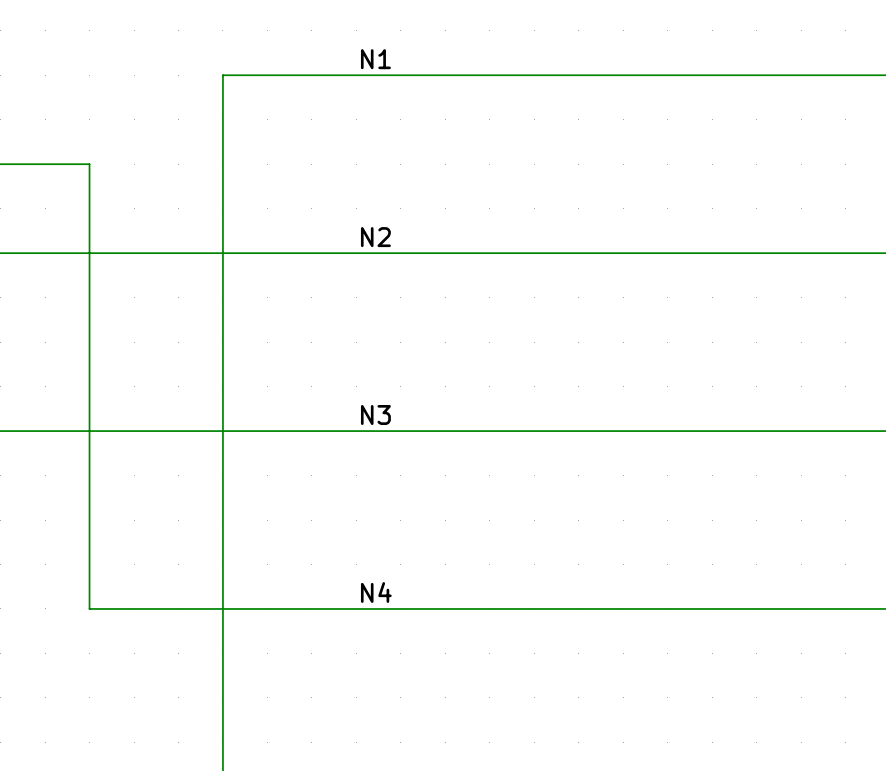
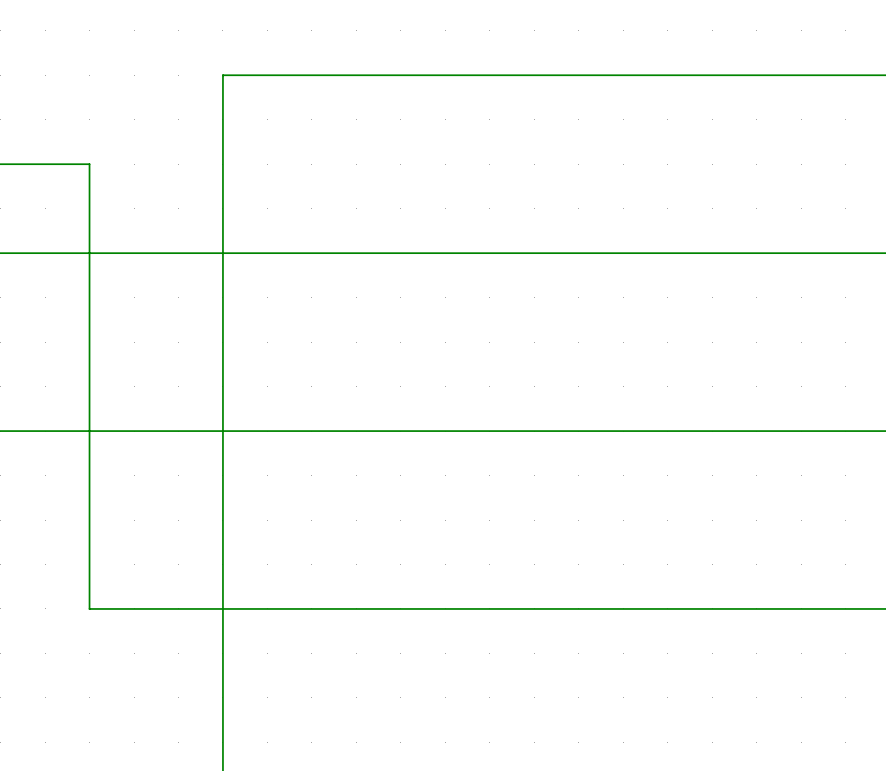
label: N1 (375, 59) -> none
label: N2 (375, 237) -> none
label: N3 (375, 415) -> none
label: N4 (376, 592) -> none

